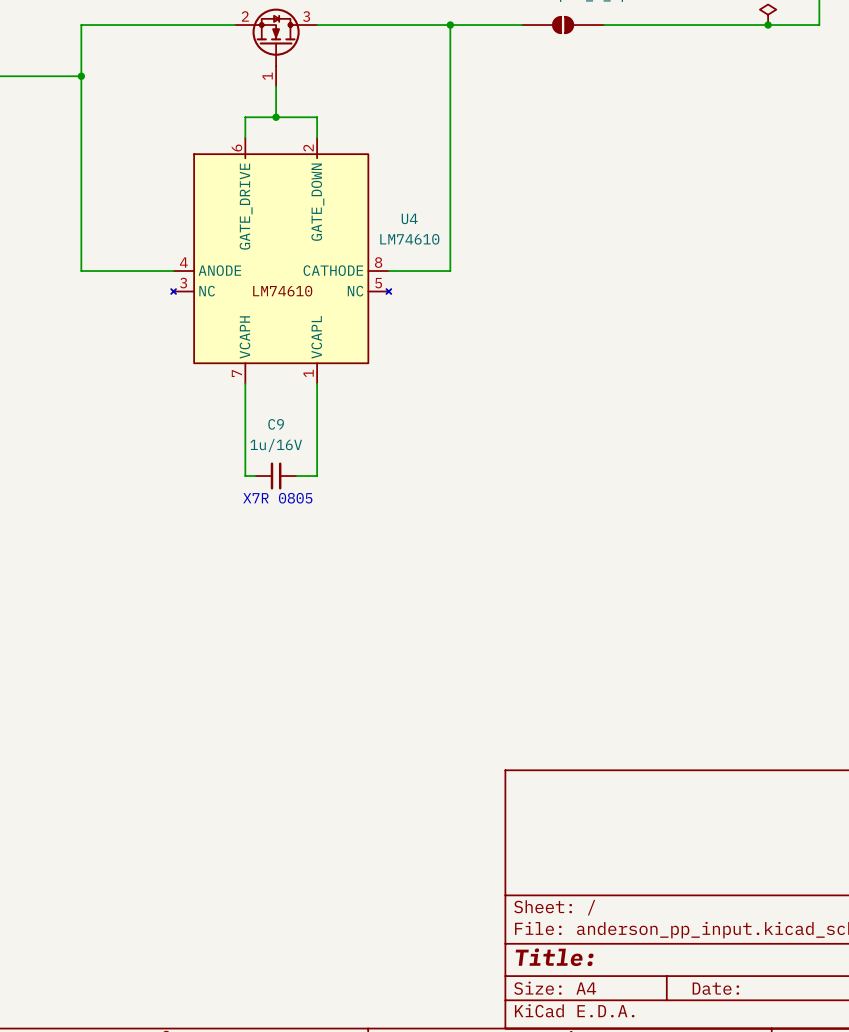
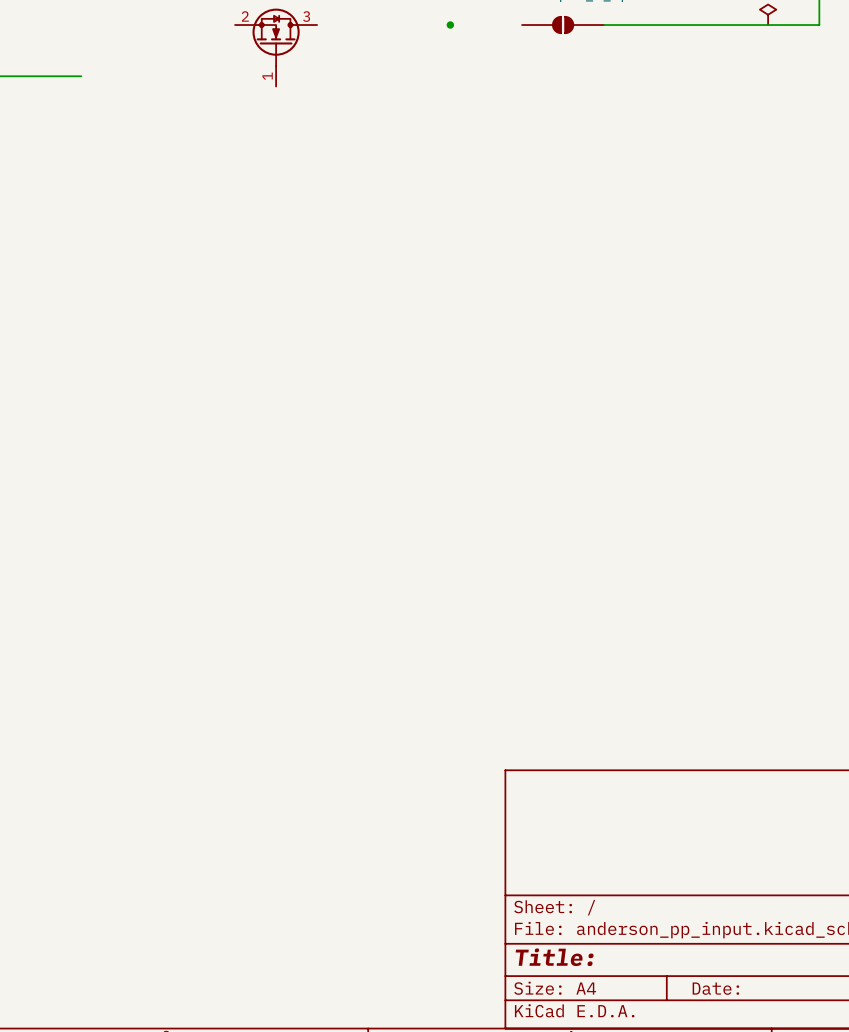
wire: (235, 25) (81, 25) (81, 271) (173, 271) -> none
wire: (317, 25) (522, 25) -> none
wire: (450, 25) (450, 271) (388, 271) -> none
junction: (768, 25) -> none
junction: (81, 76) -> none
wire: (276, 86) (276, 117) -> none
junction: (276, 117) -> none
wire: (245, 137) (245, 117) (317, 117) (317, 137) -> none
U4: LM74610 (281, 260) -> none
wire: (245, 383) (245, 476) (255, 476) -> none
wire: (317, 383) (317, 476) (296, 476) -> none
C9: 1u/16V (276, 476) -> none
text: X7R 0805 (277, 498) -> none

